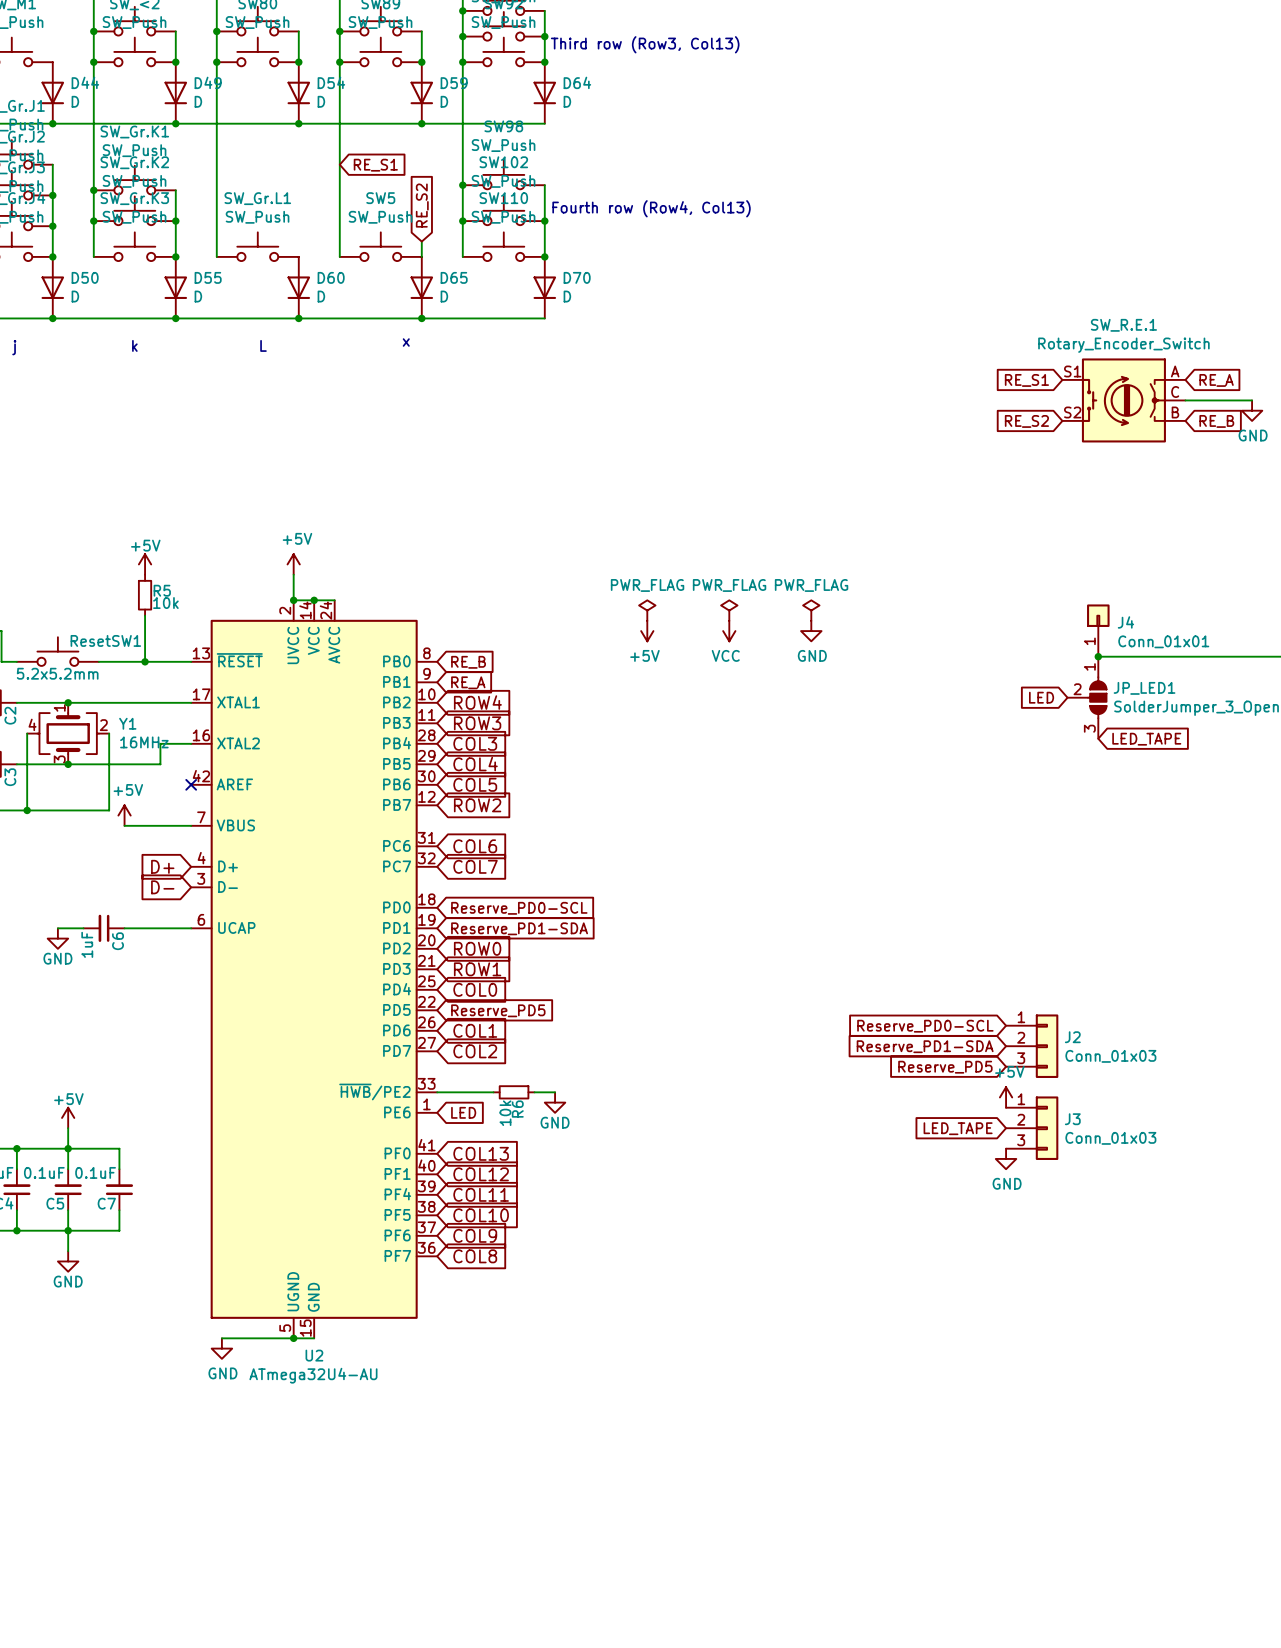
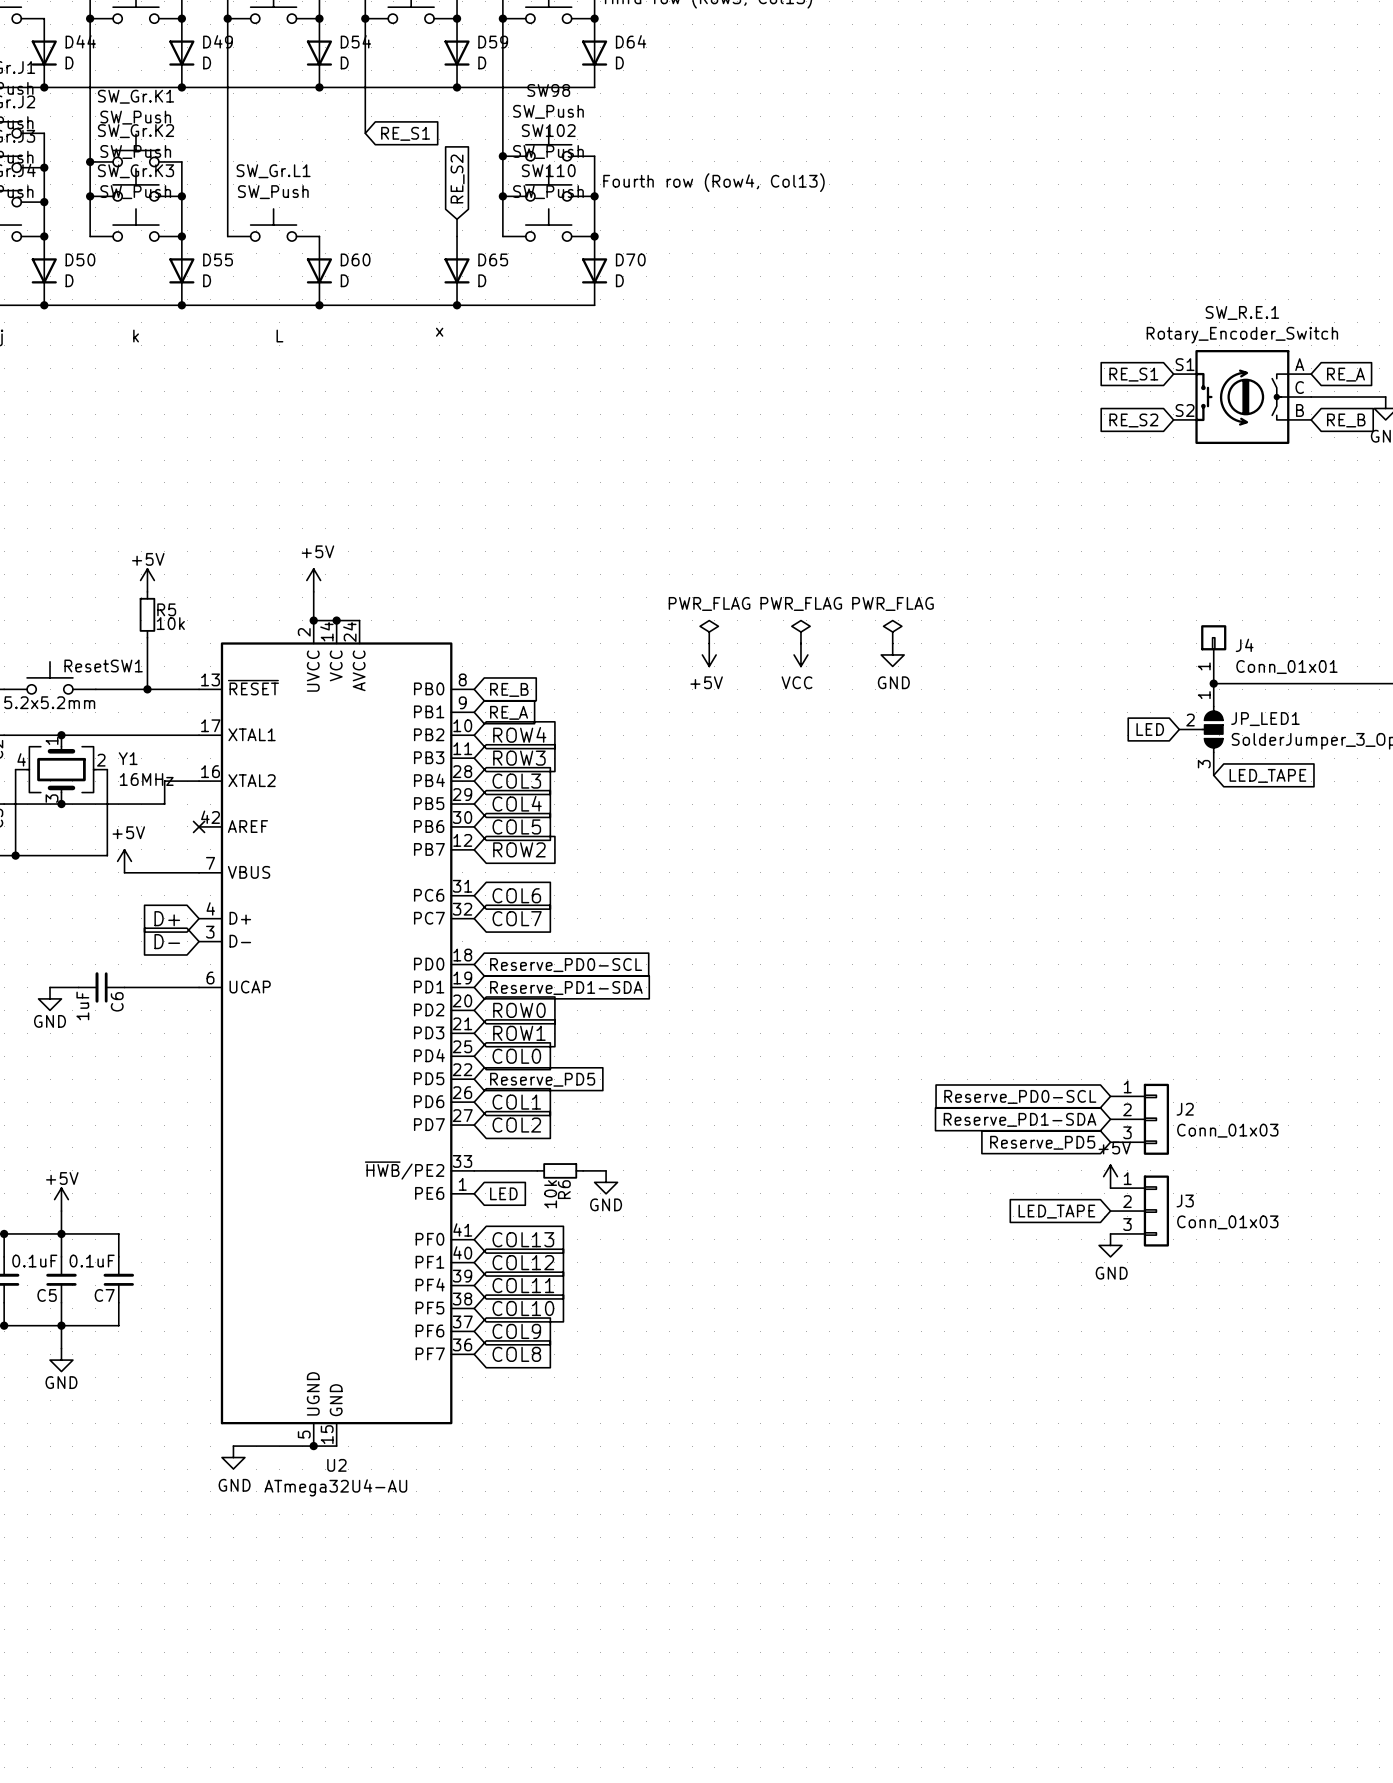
wire: (339, 164) (339, 256) -> none
SW5: SW_Push (380, 246) -> none

